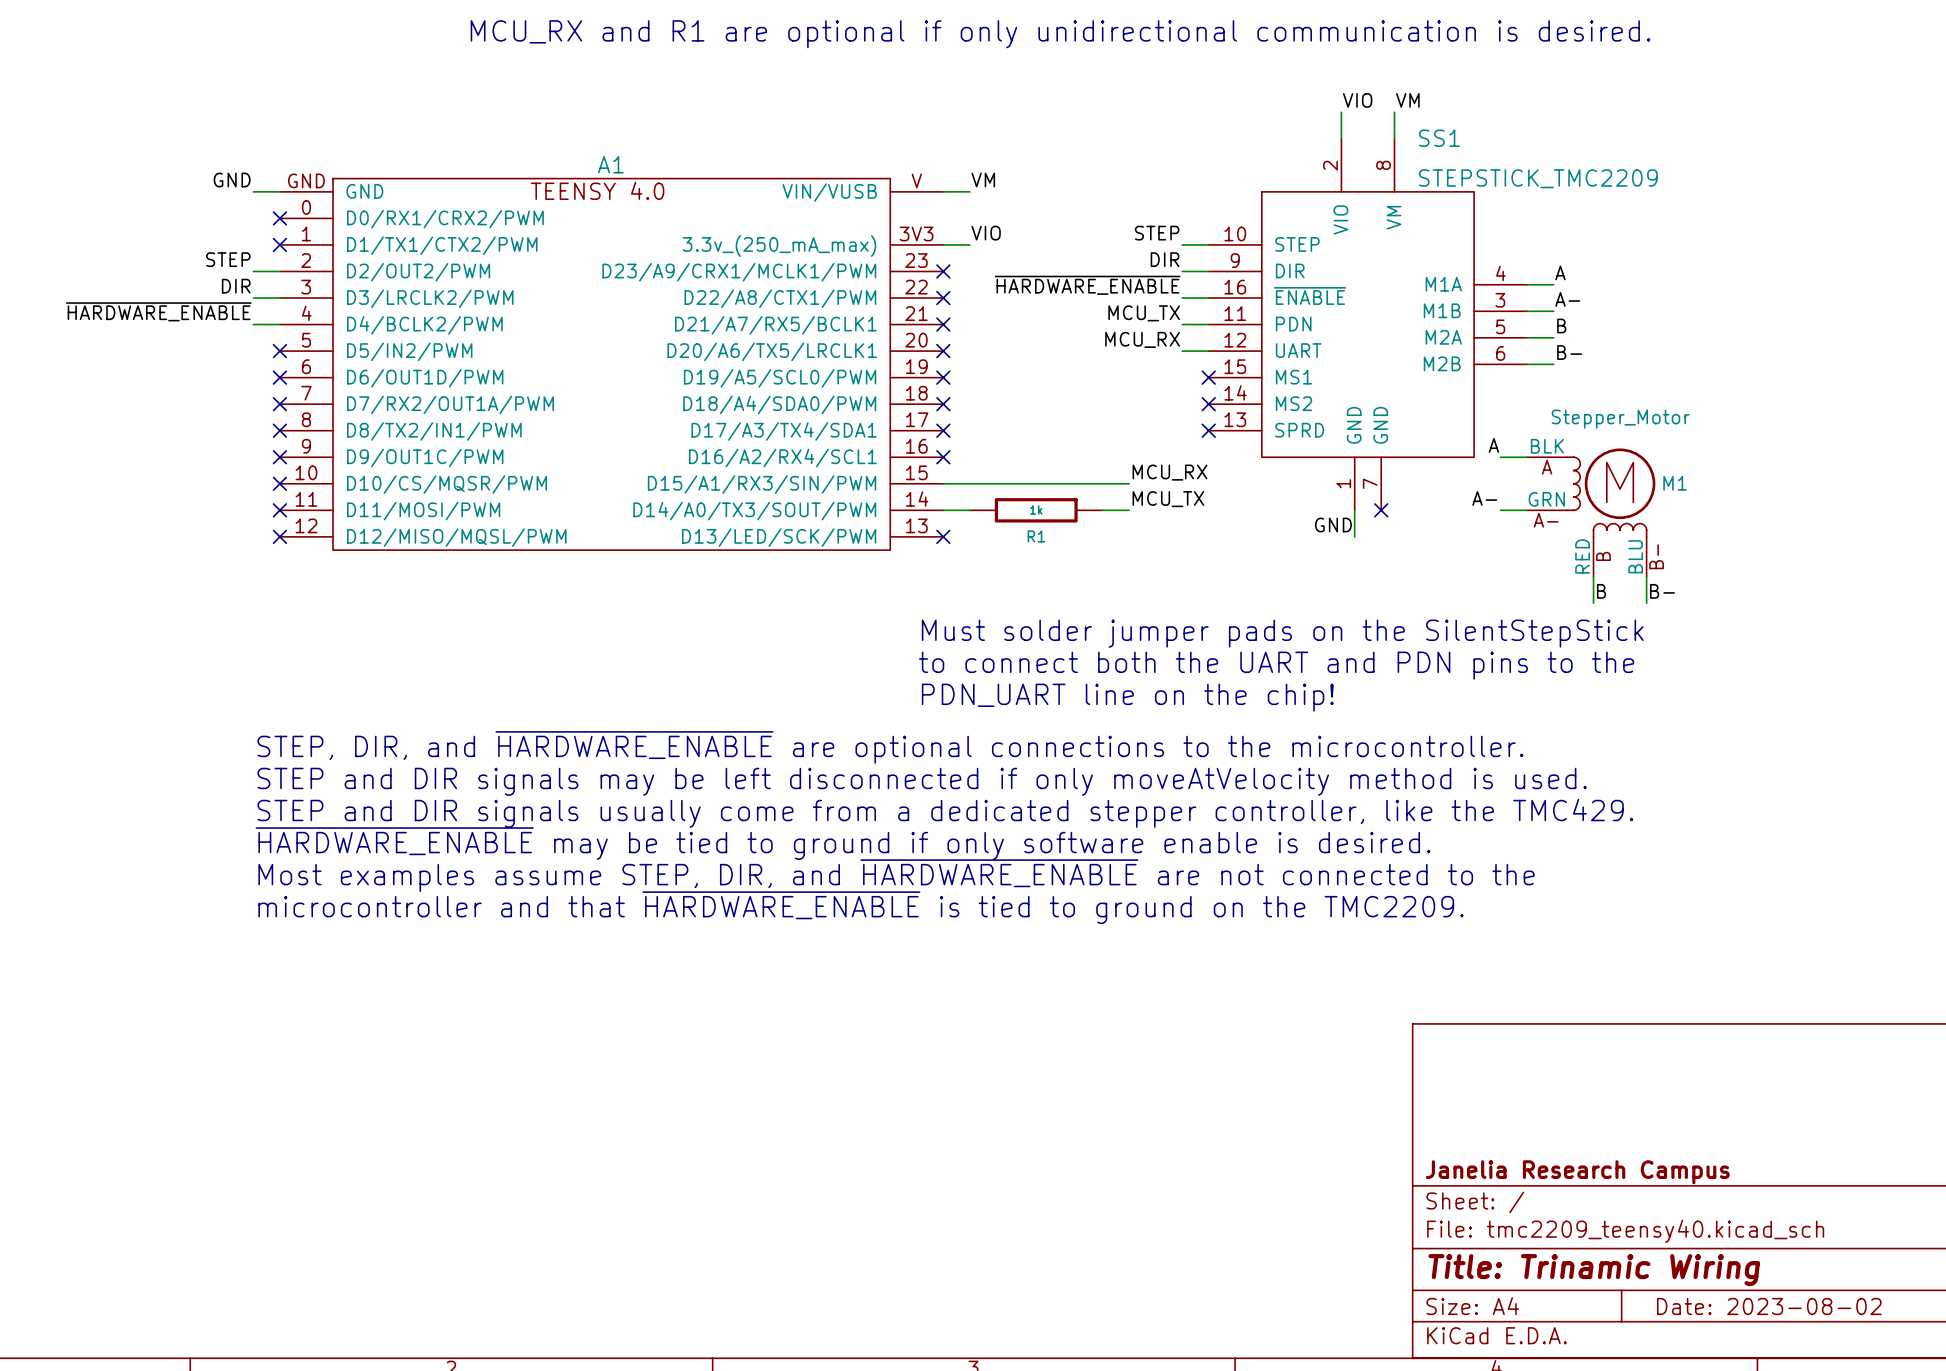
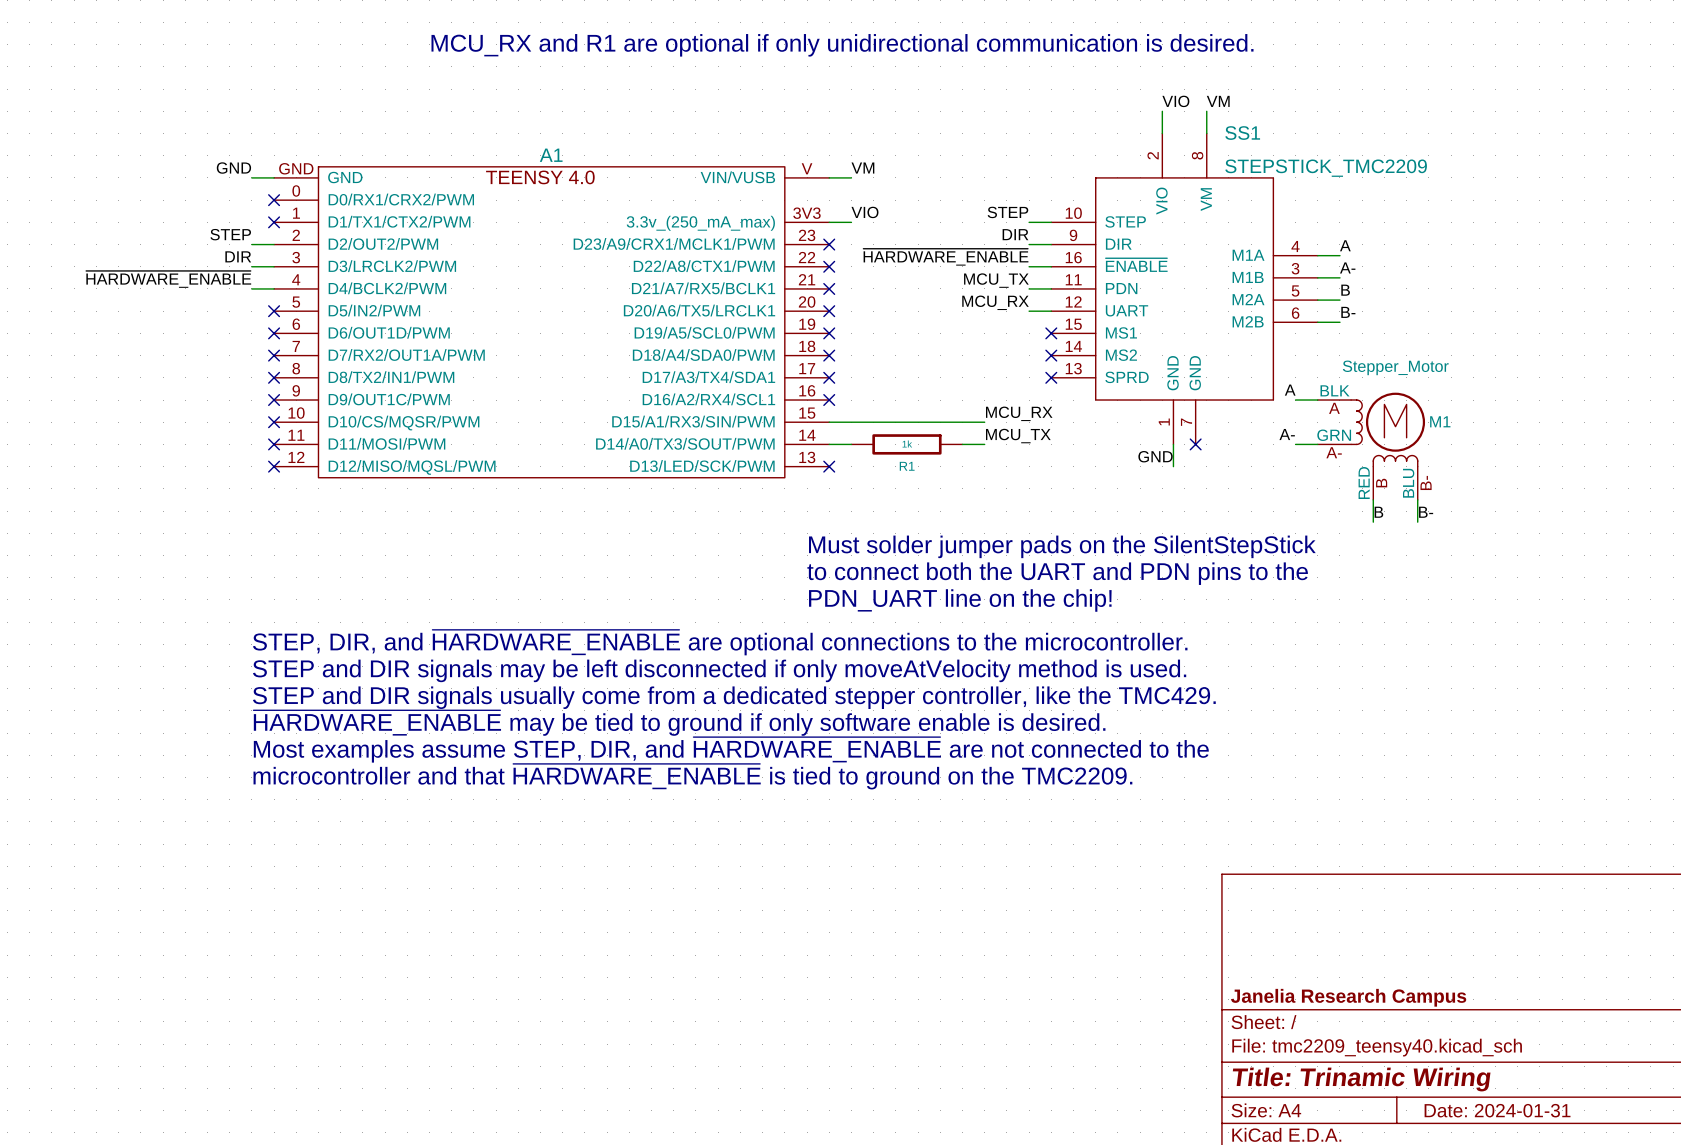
title block: Date: 2023-08-02 (1769, 1306) -> Date: 2024-01-31 (1497, 1110)

